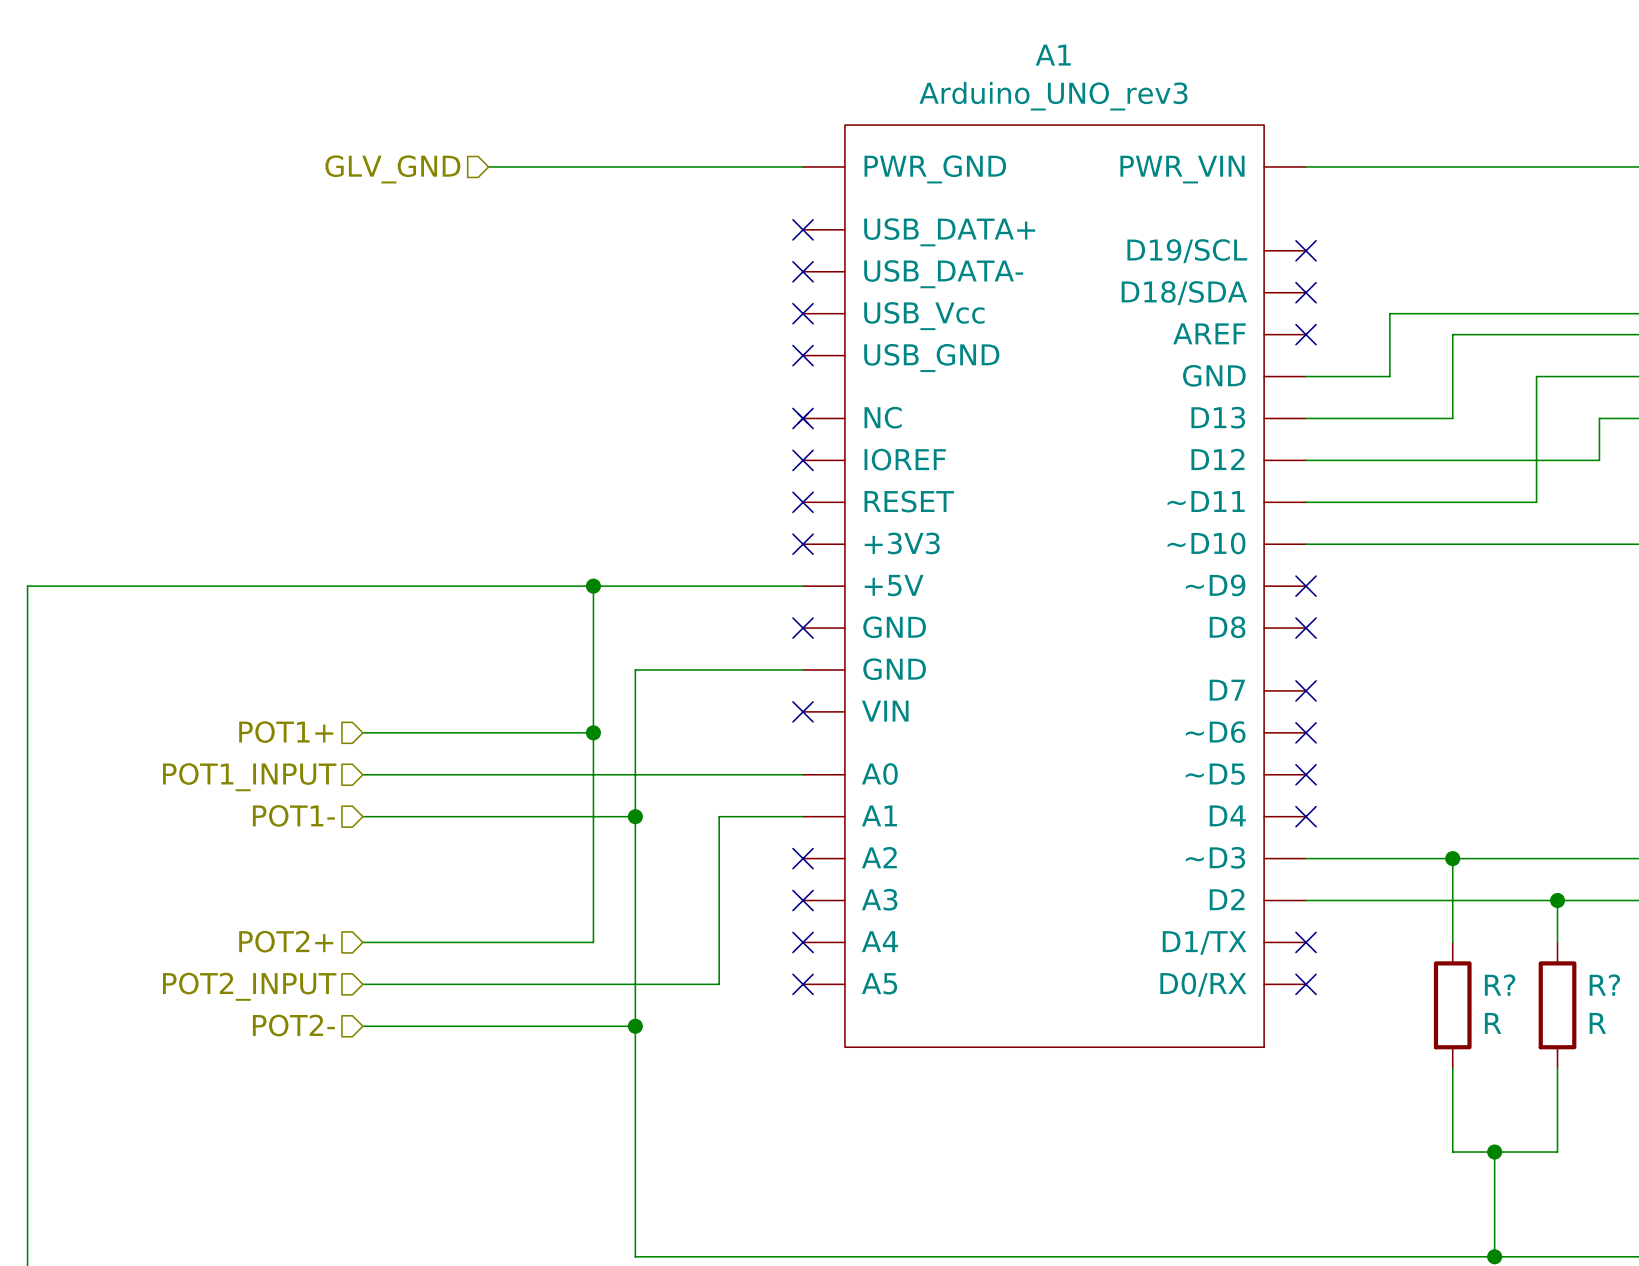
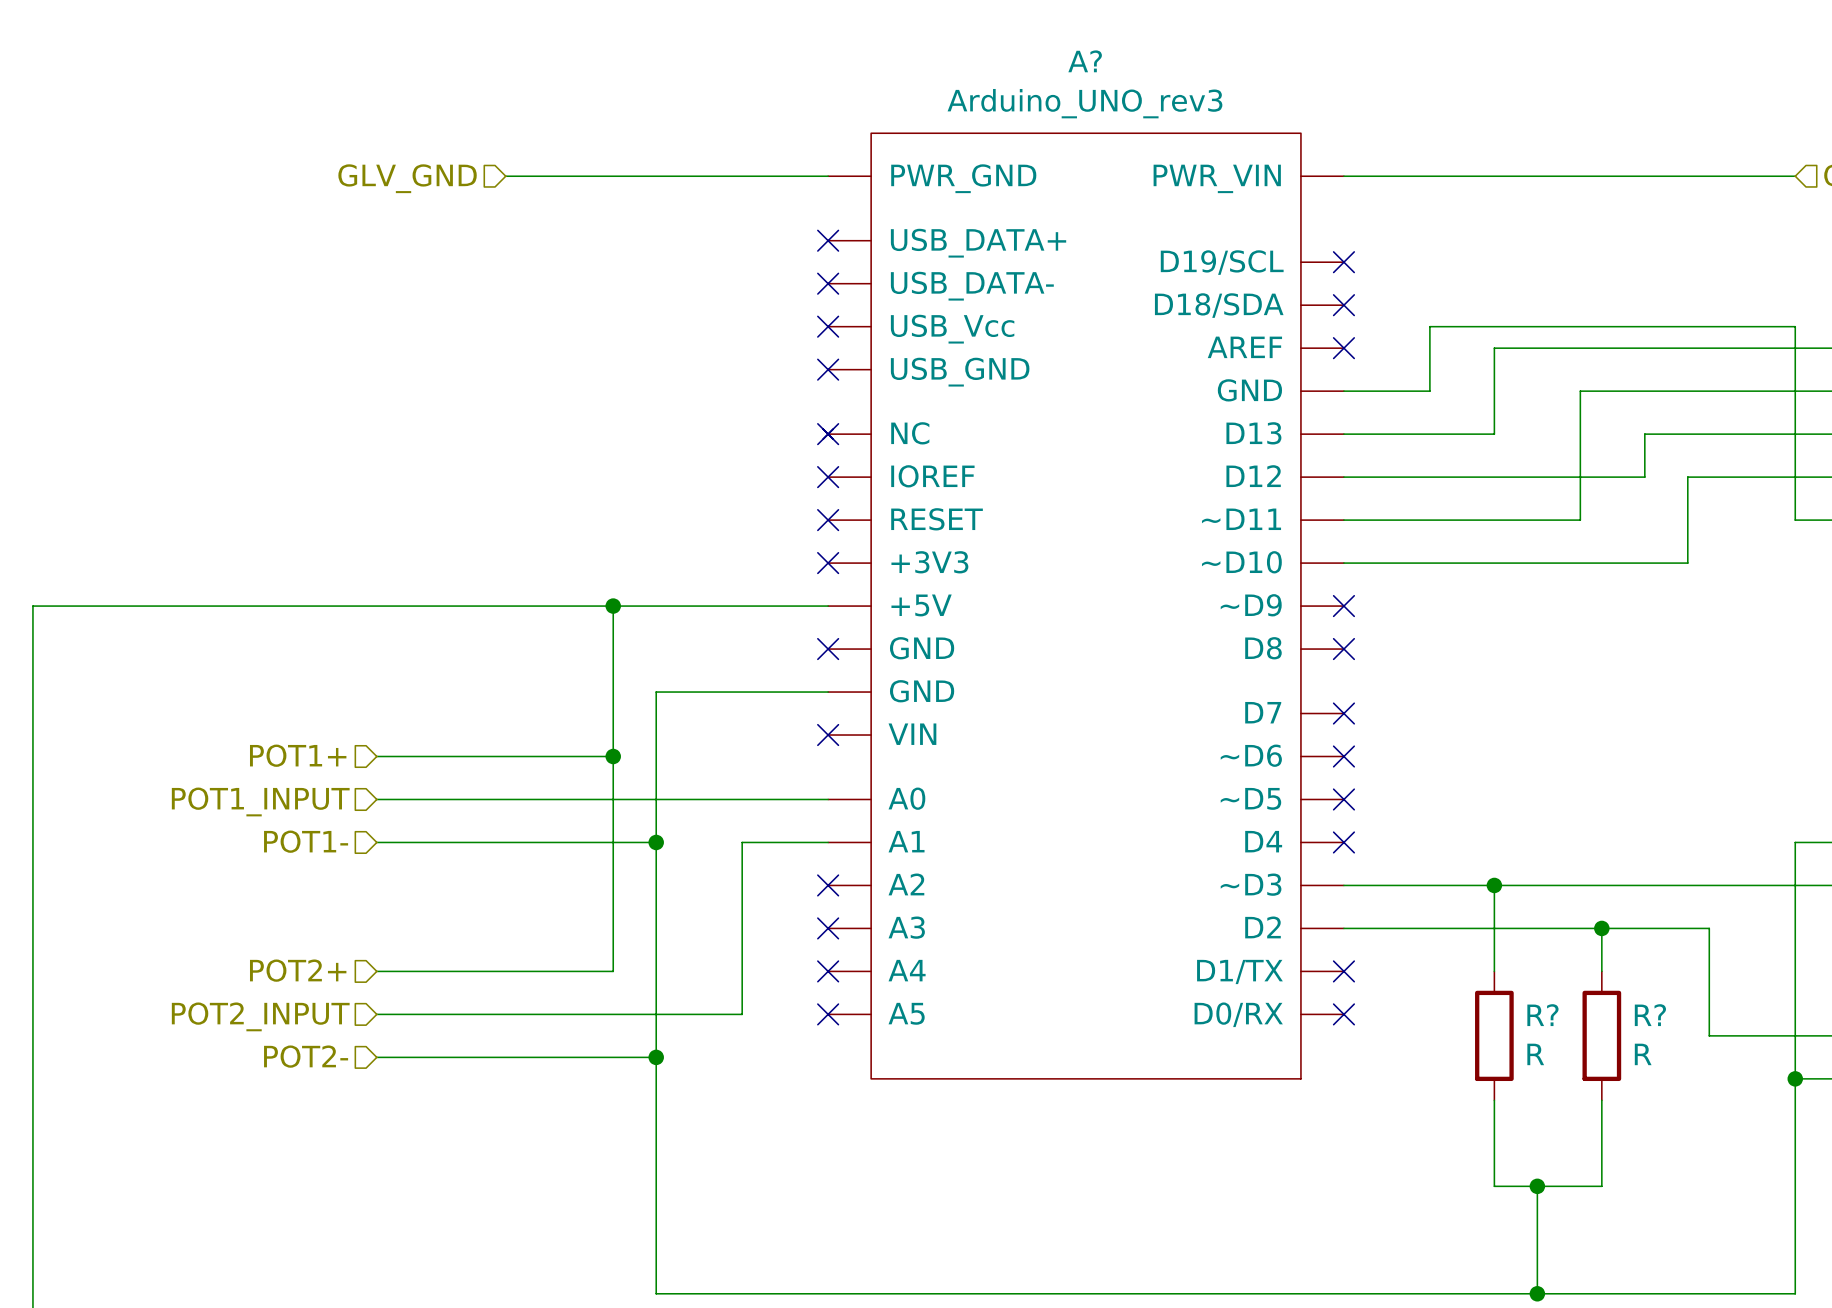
A1 name: A1 (1053, 55) -> A? (1085, 61)

